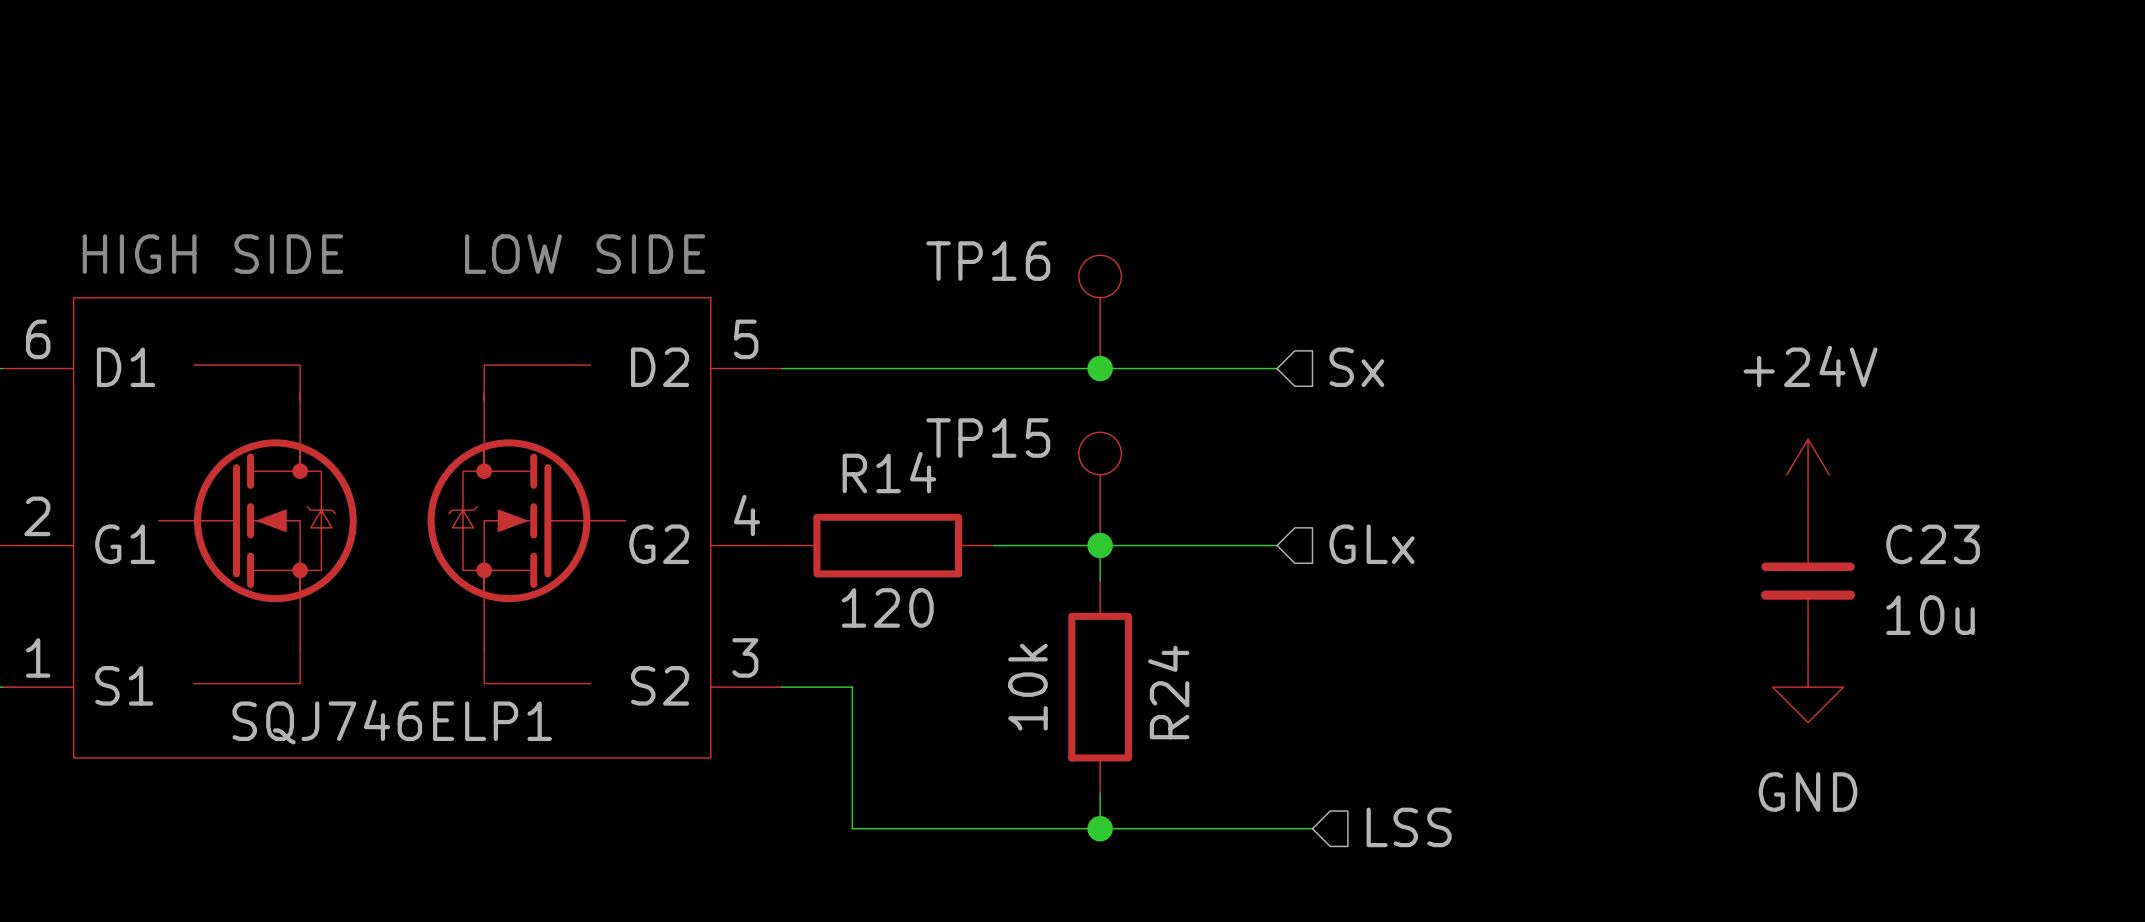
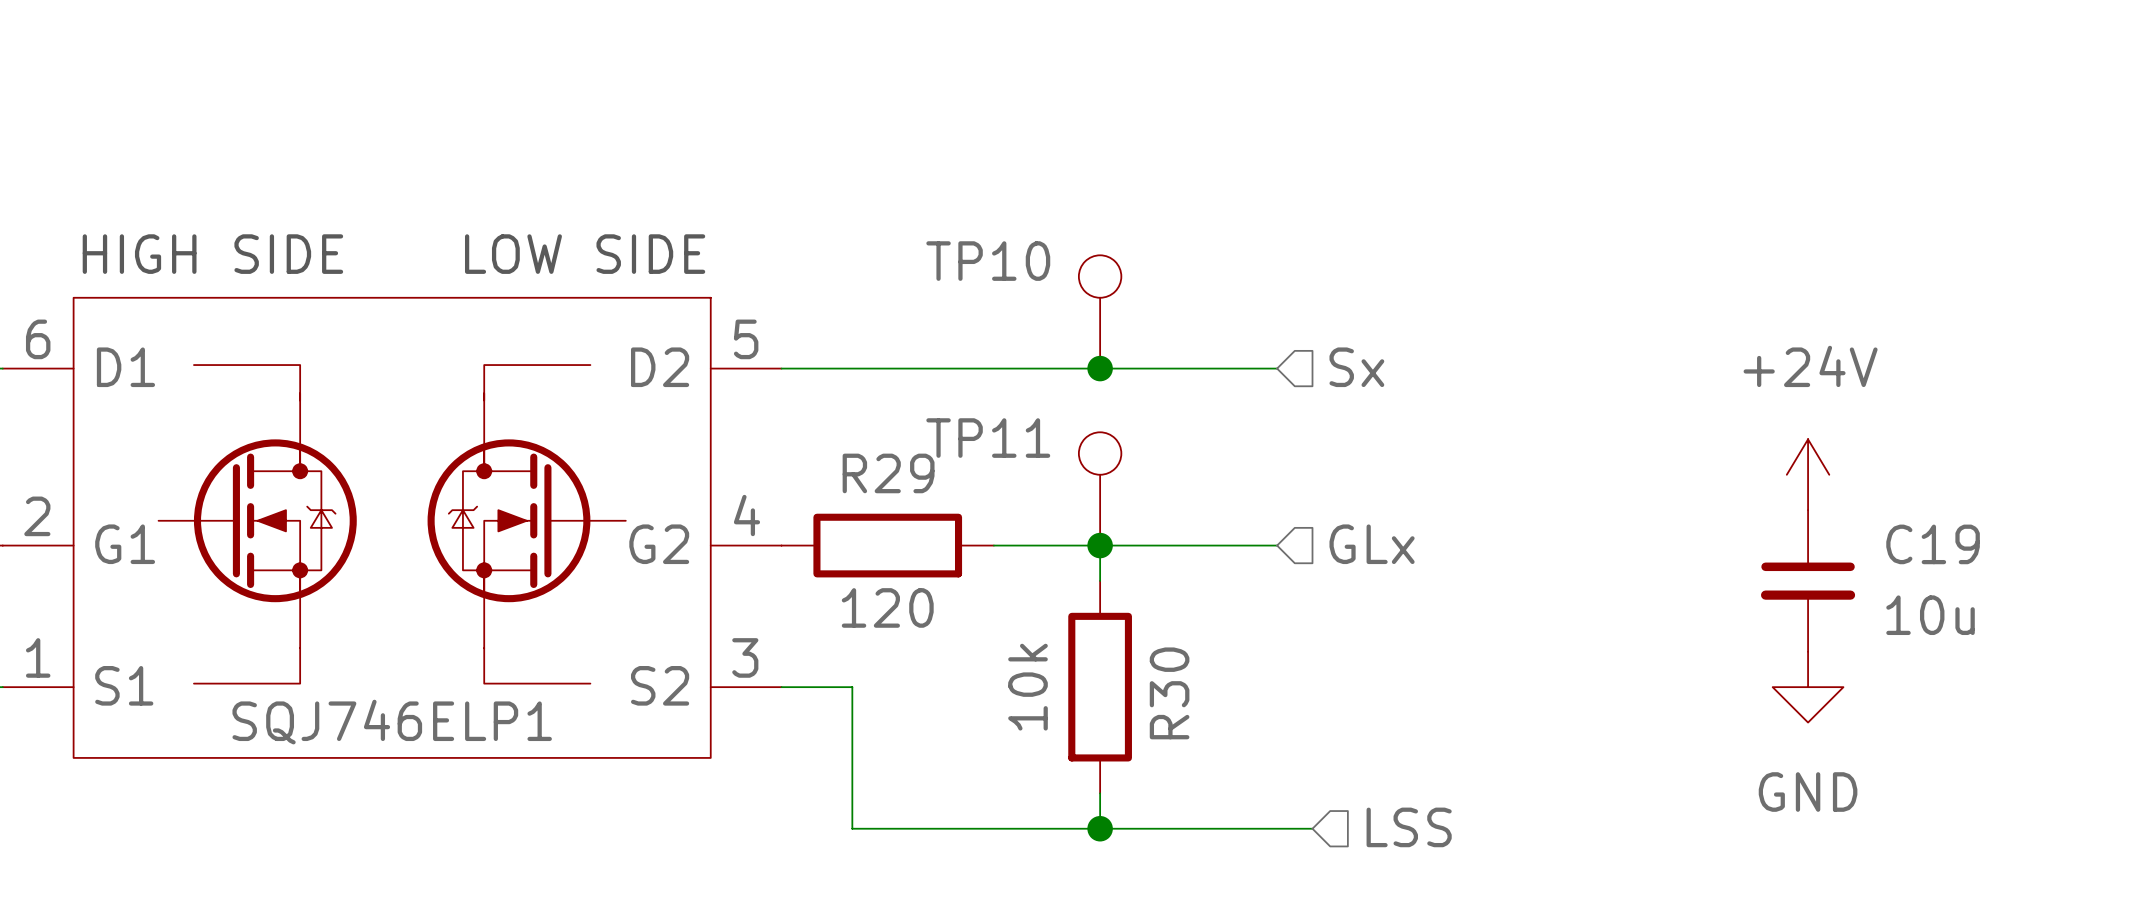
TP16 name: TP16 (988, 261) -> TP10 (988, 261)
TP15 name: TP15 (988, 438) -> TP11 (988, 438)
R14 name: R14 (889, 472) -> R29 (888, 473)
C23 name: C23 (1933, 544) -> C19 (1933, 544)
R24 name: R24 (1168, 692) -> R30 (1169, 693)

